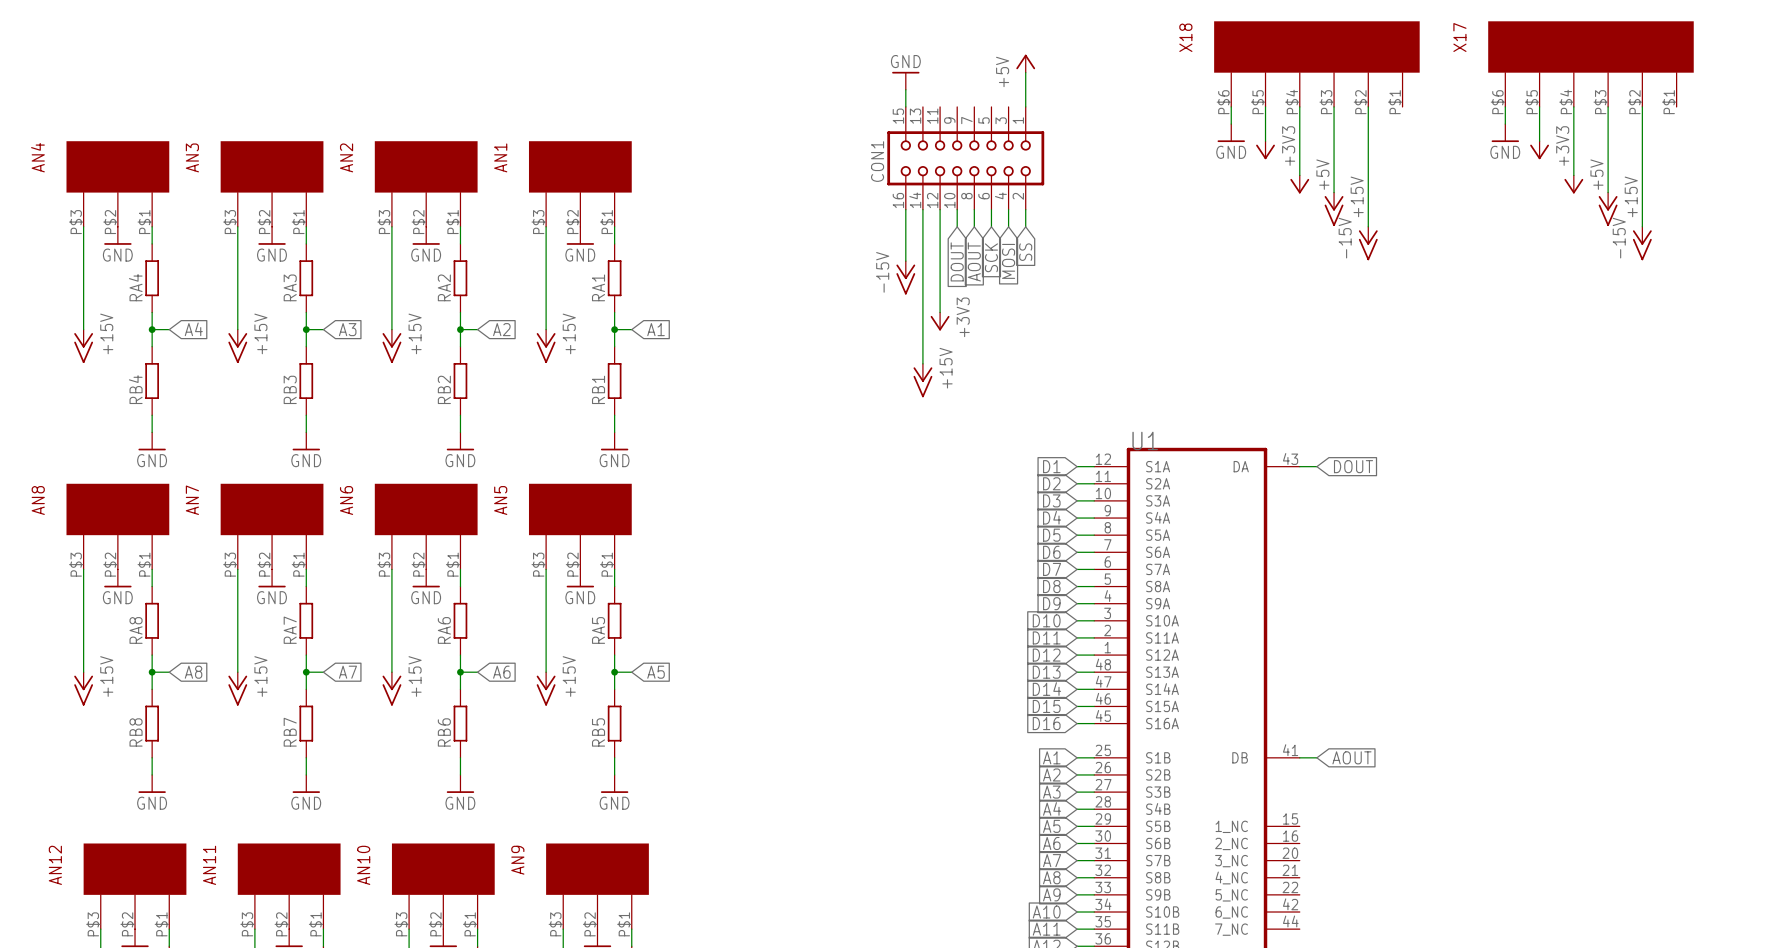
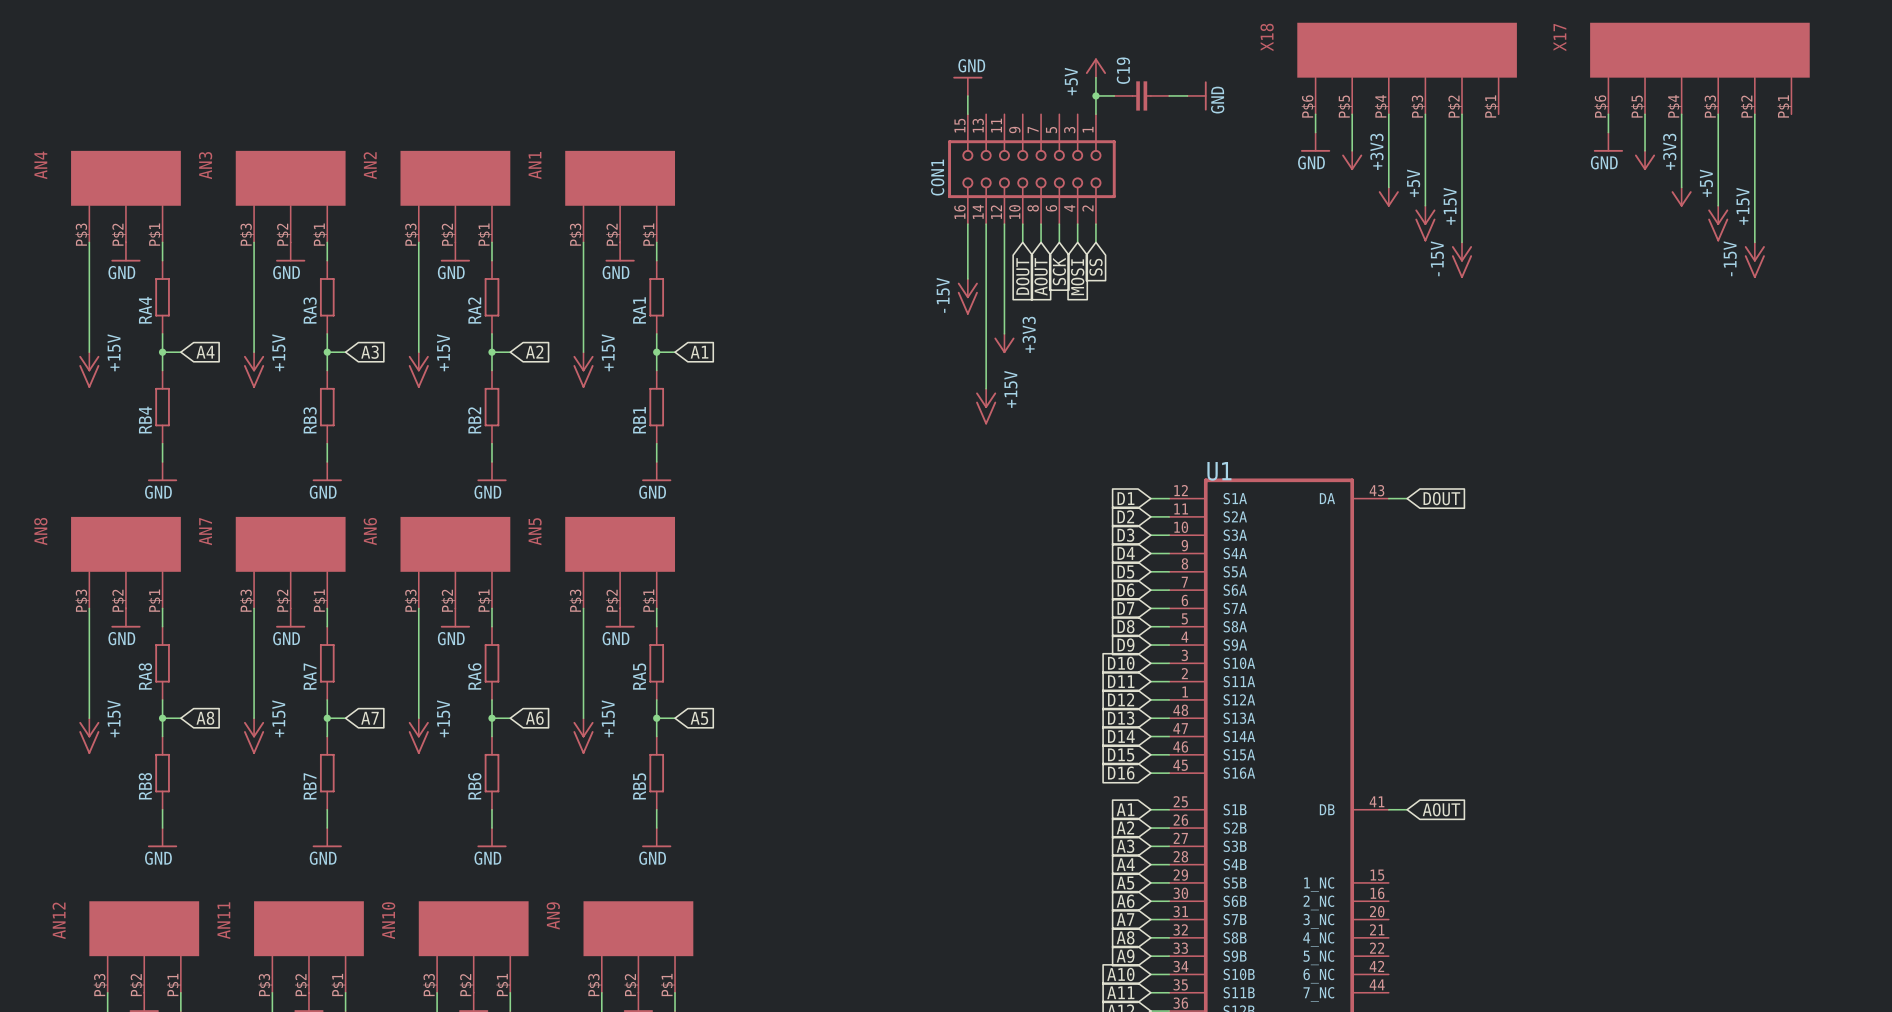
wire: none -> (1095, 95) (1114, 95)
junction: none -> (1095, 95)
C19: none -> (1141, 95)
wire: none -> (1169, 95) (1187, 95)
power symbol: none -> GND (1197, 95)

